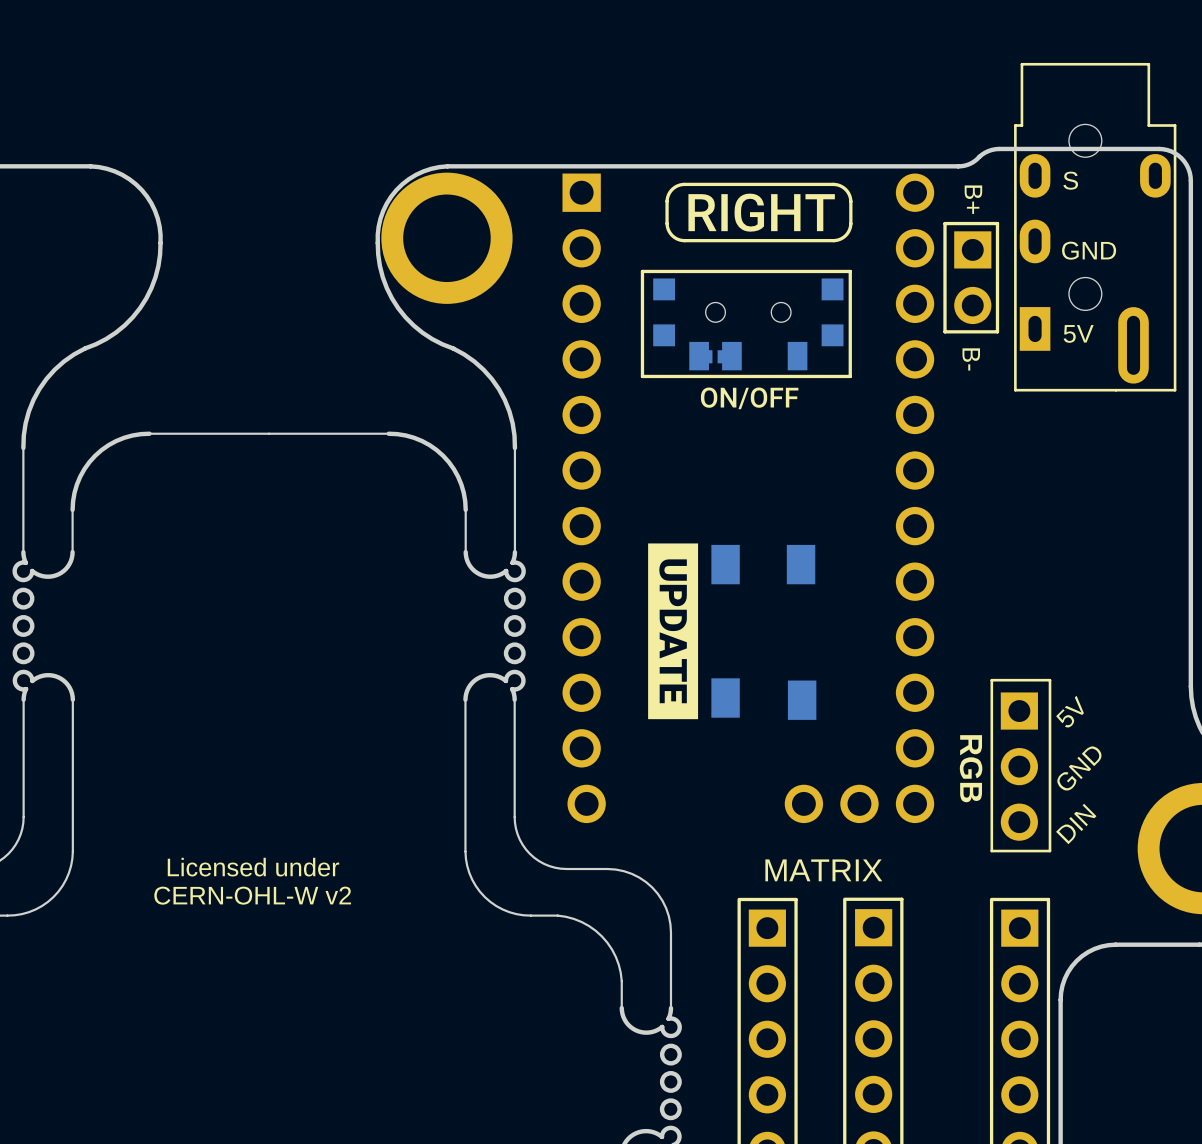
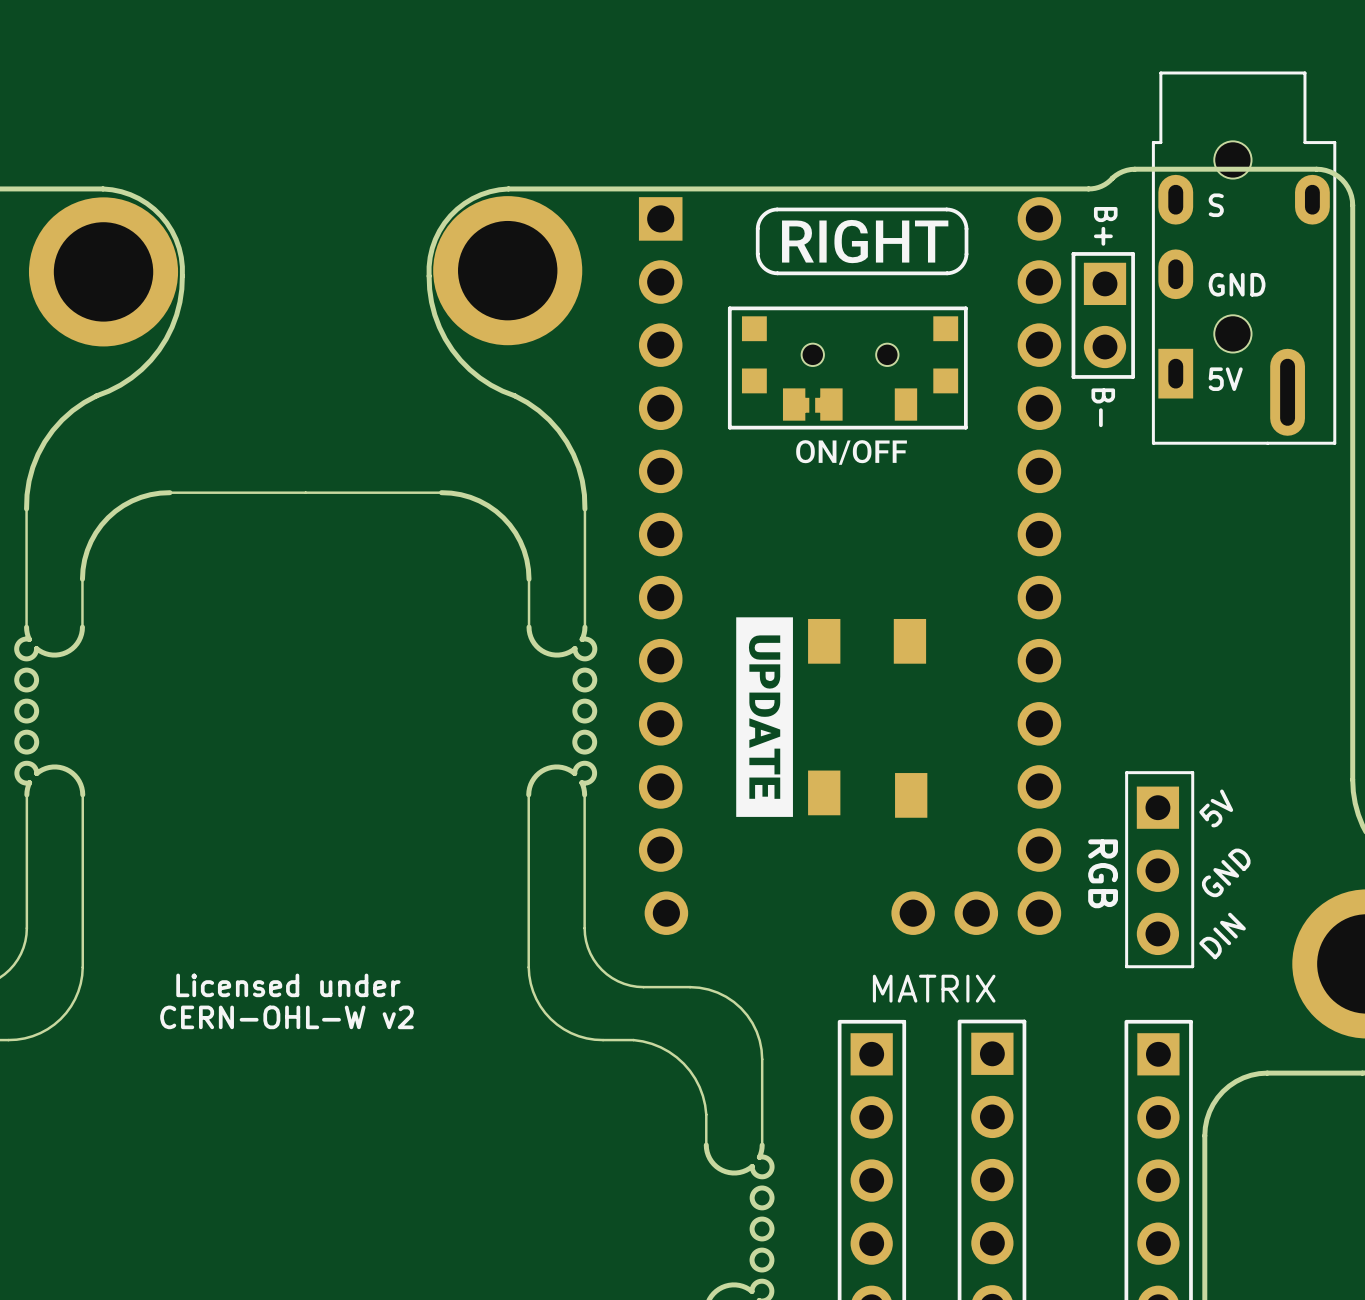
part: none -> (103, 271)

